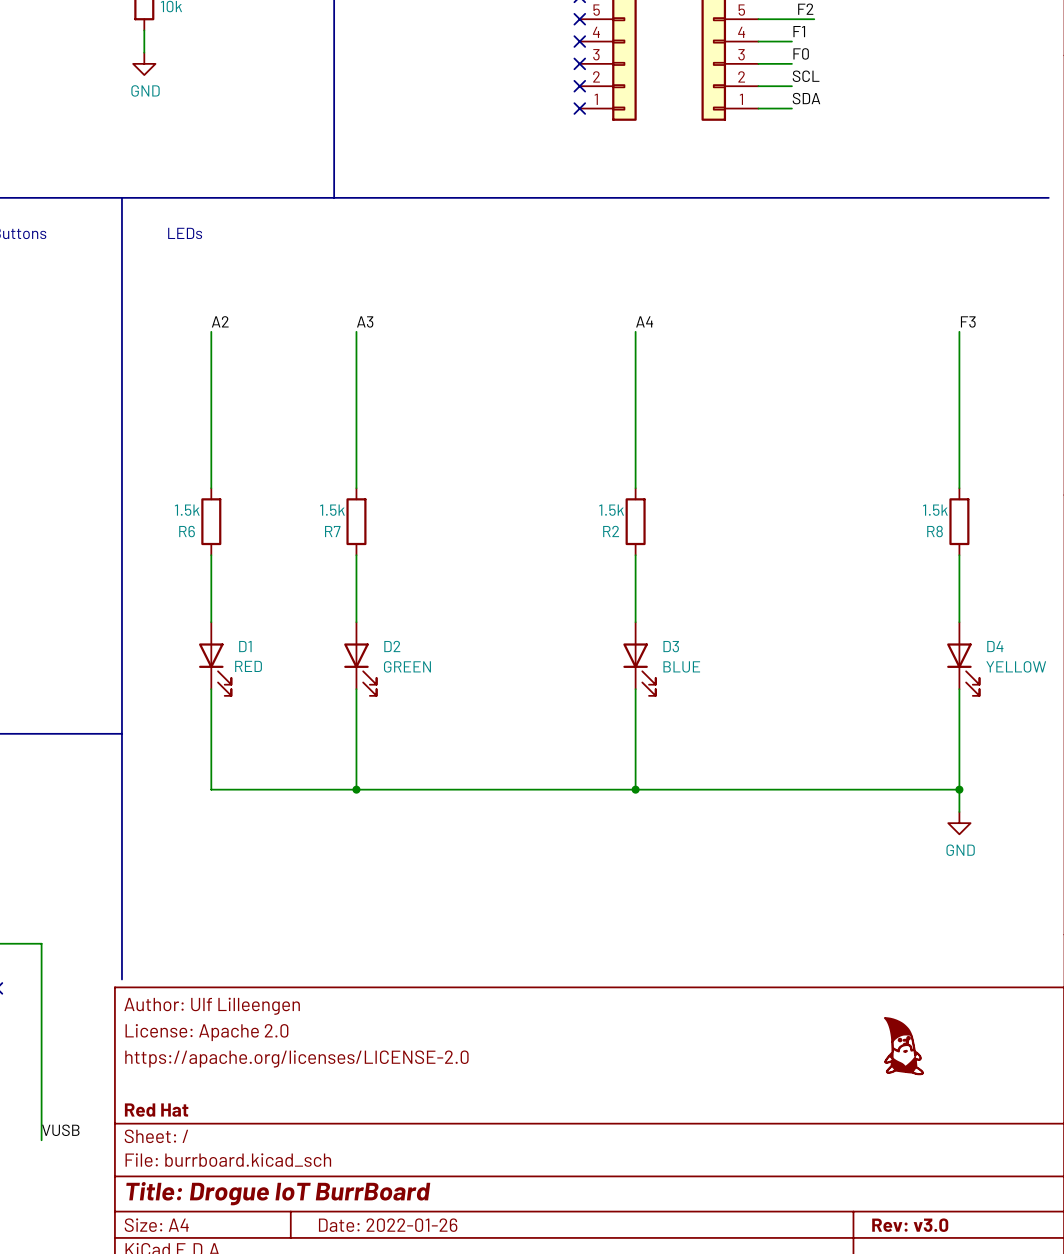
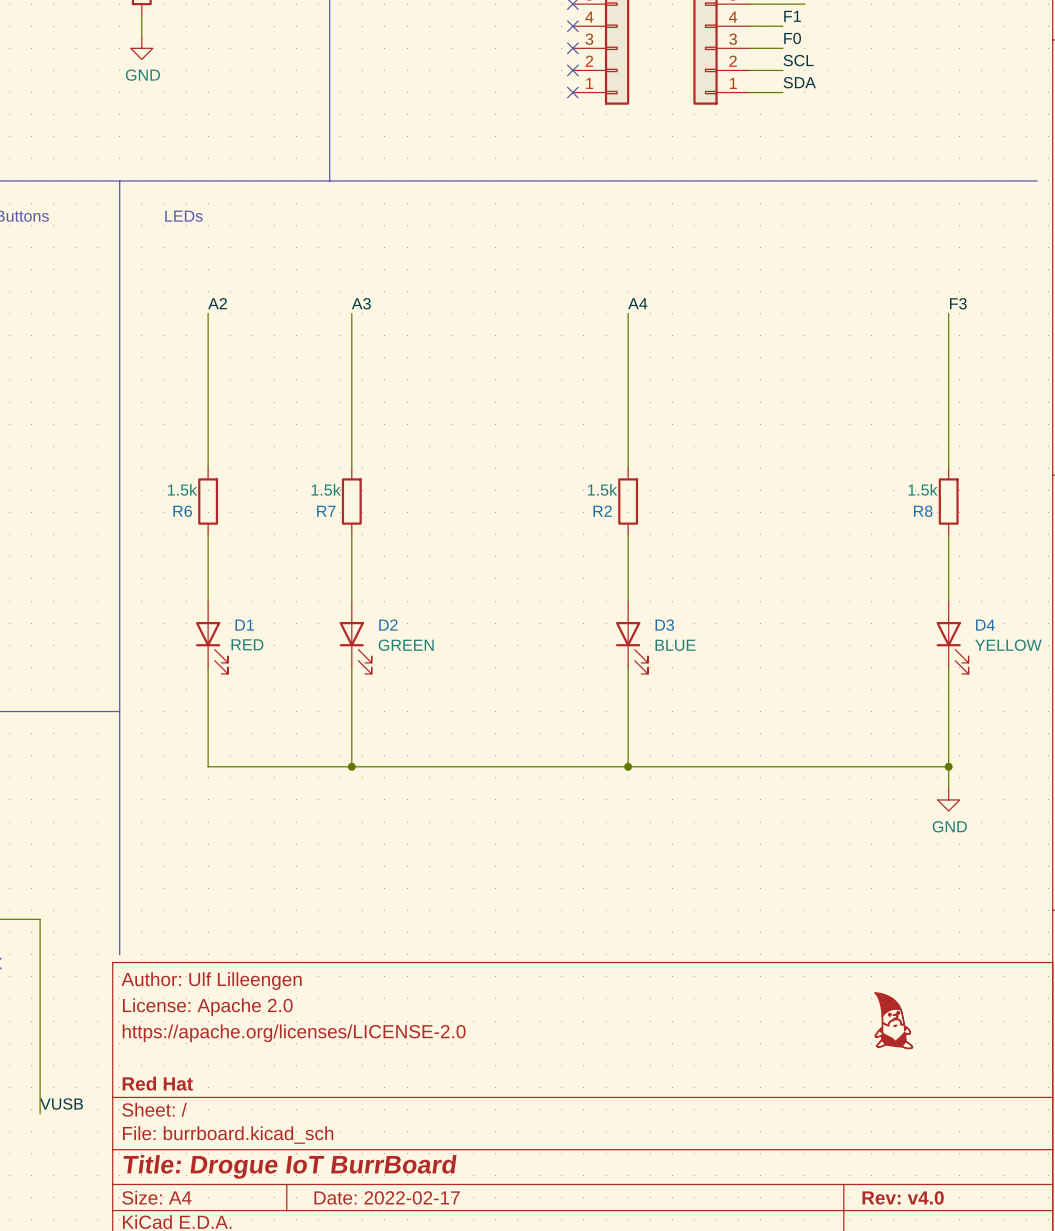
title block: Date: 2022-01-26 (388, 1225) -> Date: 2022-02-17 (387, 1197)
title block: Rev: v3.0 (910, 1225) -> Rev: v4.0 (903, 1197)

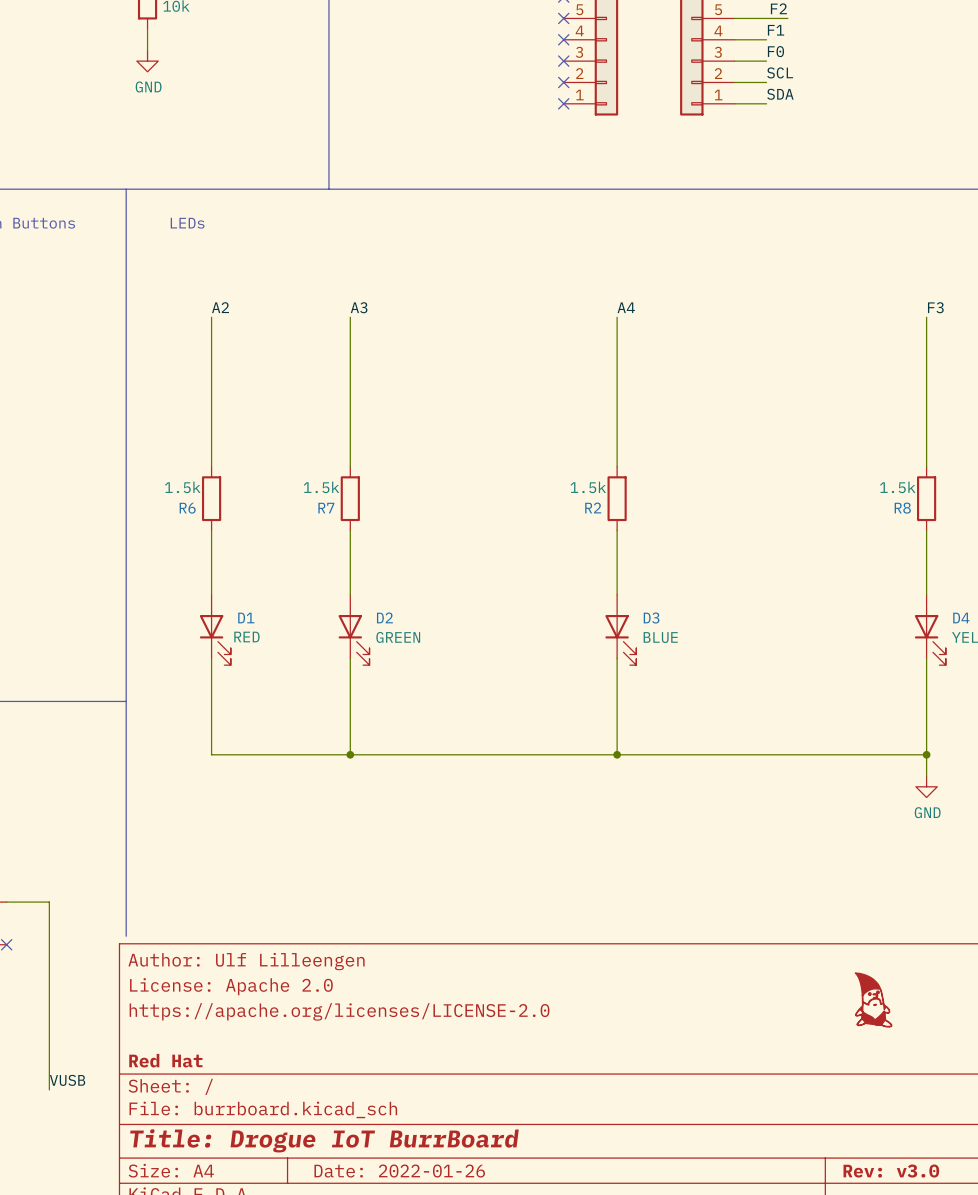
title block: Date: 2022-02-17 (387, 1197) -> Date: 2022-01-26 (399, 1171)
title block: Rev: v4.0 (903, 1197) -> Rev: v3.0 (891, 1171)

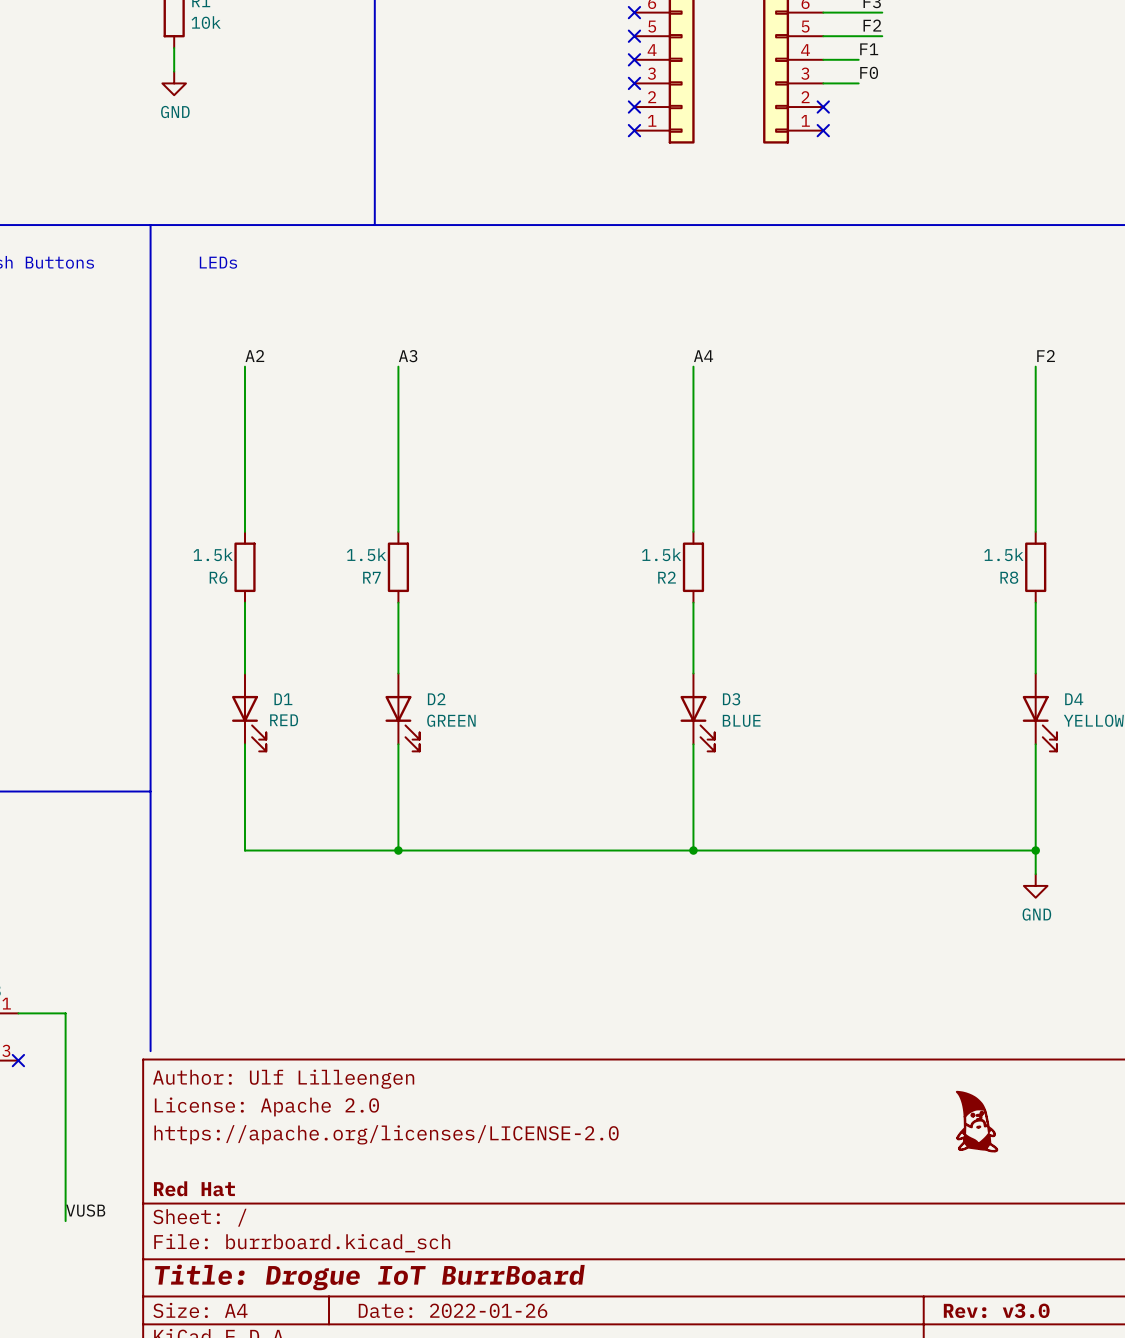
label: SCL (780, 72) -> none
wire: (734, 82) (766, 82) -> none
no-connect mark: none -> (823, 107)
label: SDA (780, 94) -> none
wire: (734, 103) (766, 103) -> none
no-connect mark: none -> (823, 130)
label: F3 (935, 307) -> F2 (1046, 356)

